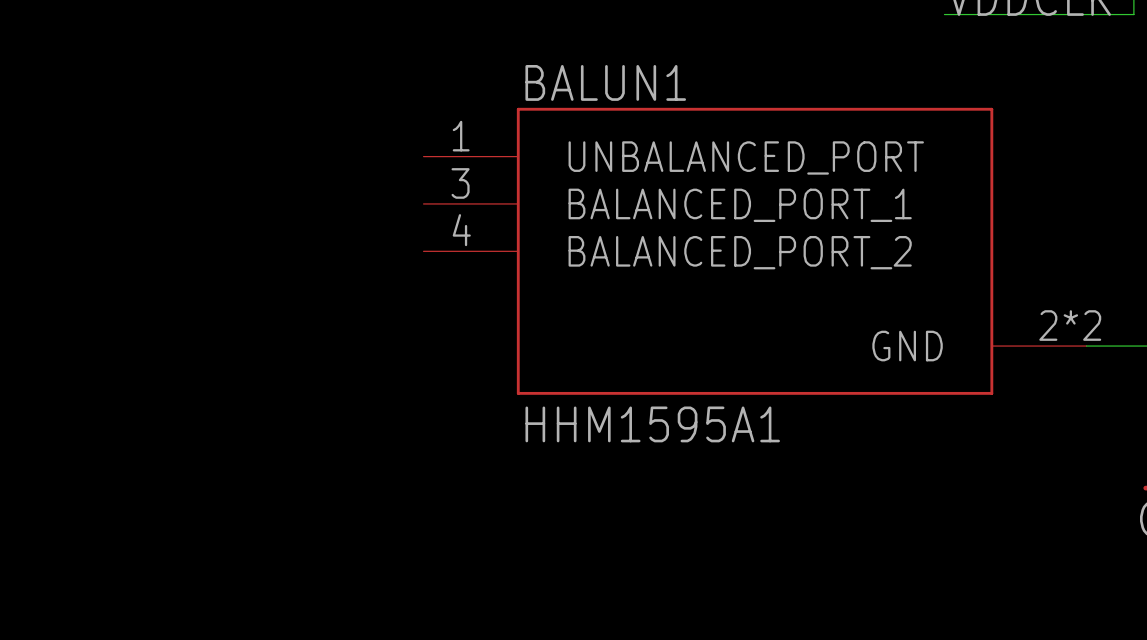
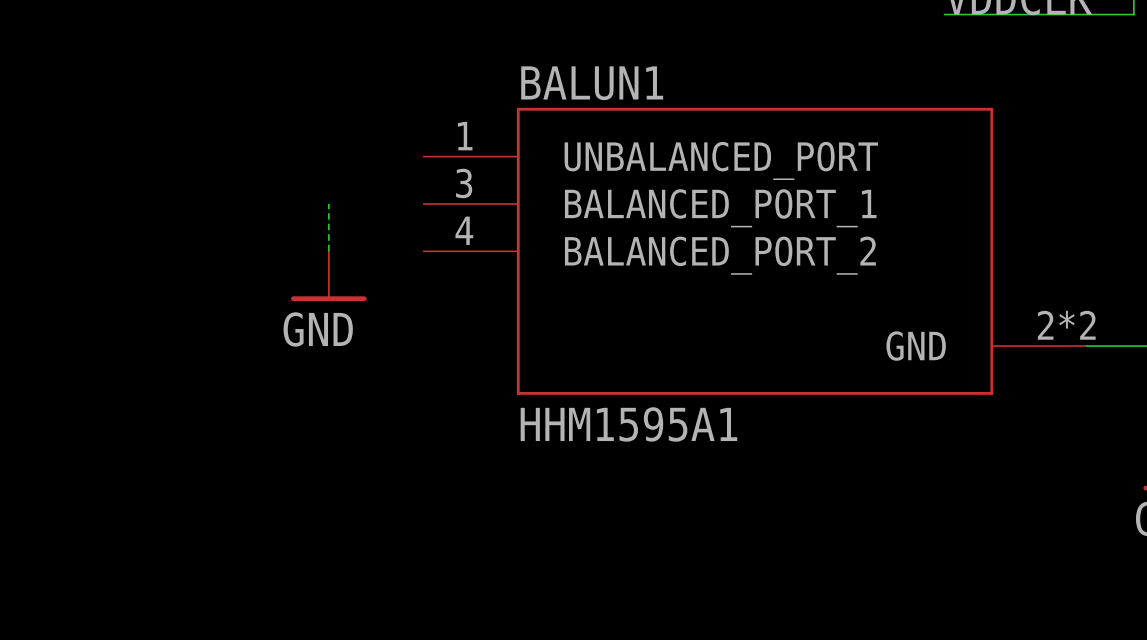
wire: none -> (328, 203) (328, 251)
power symbol: none -> GND (328, 276)

